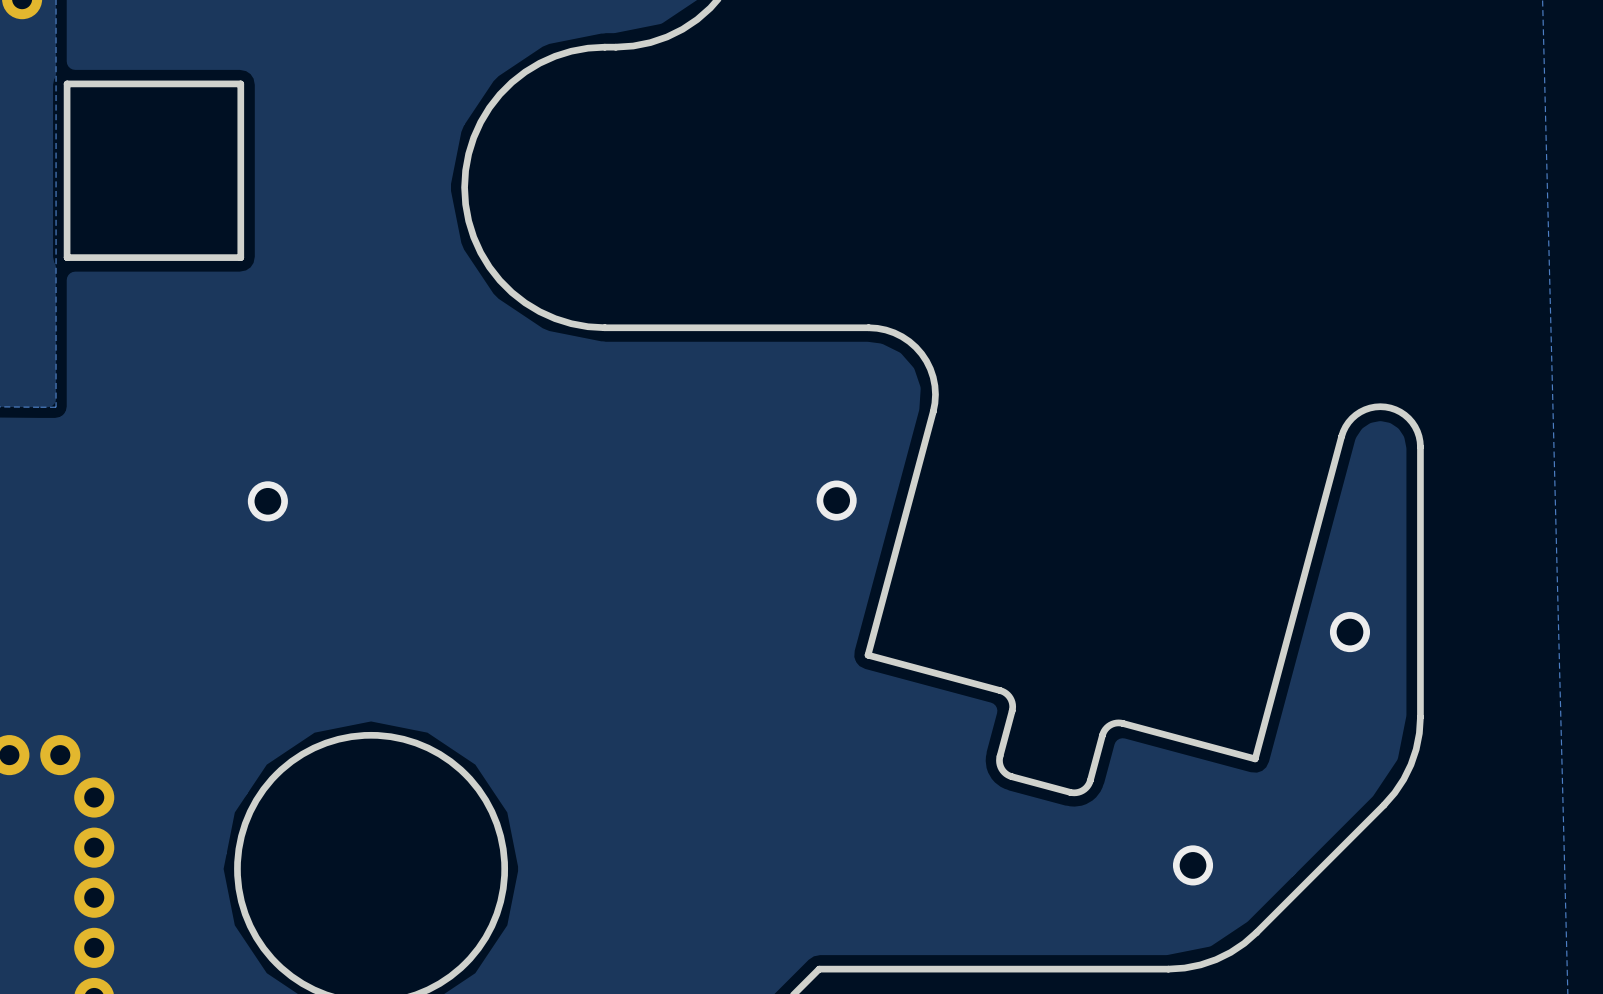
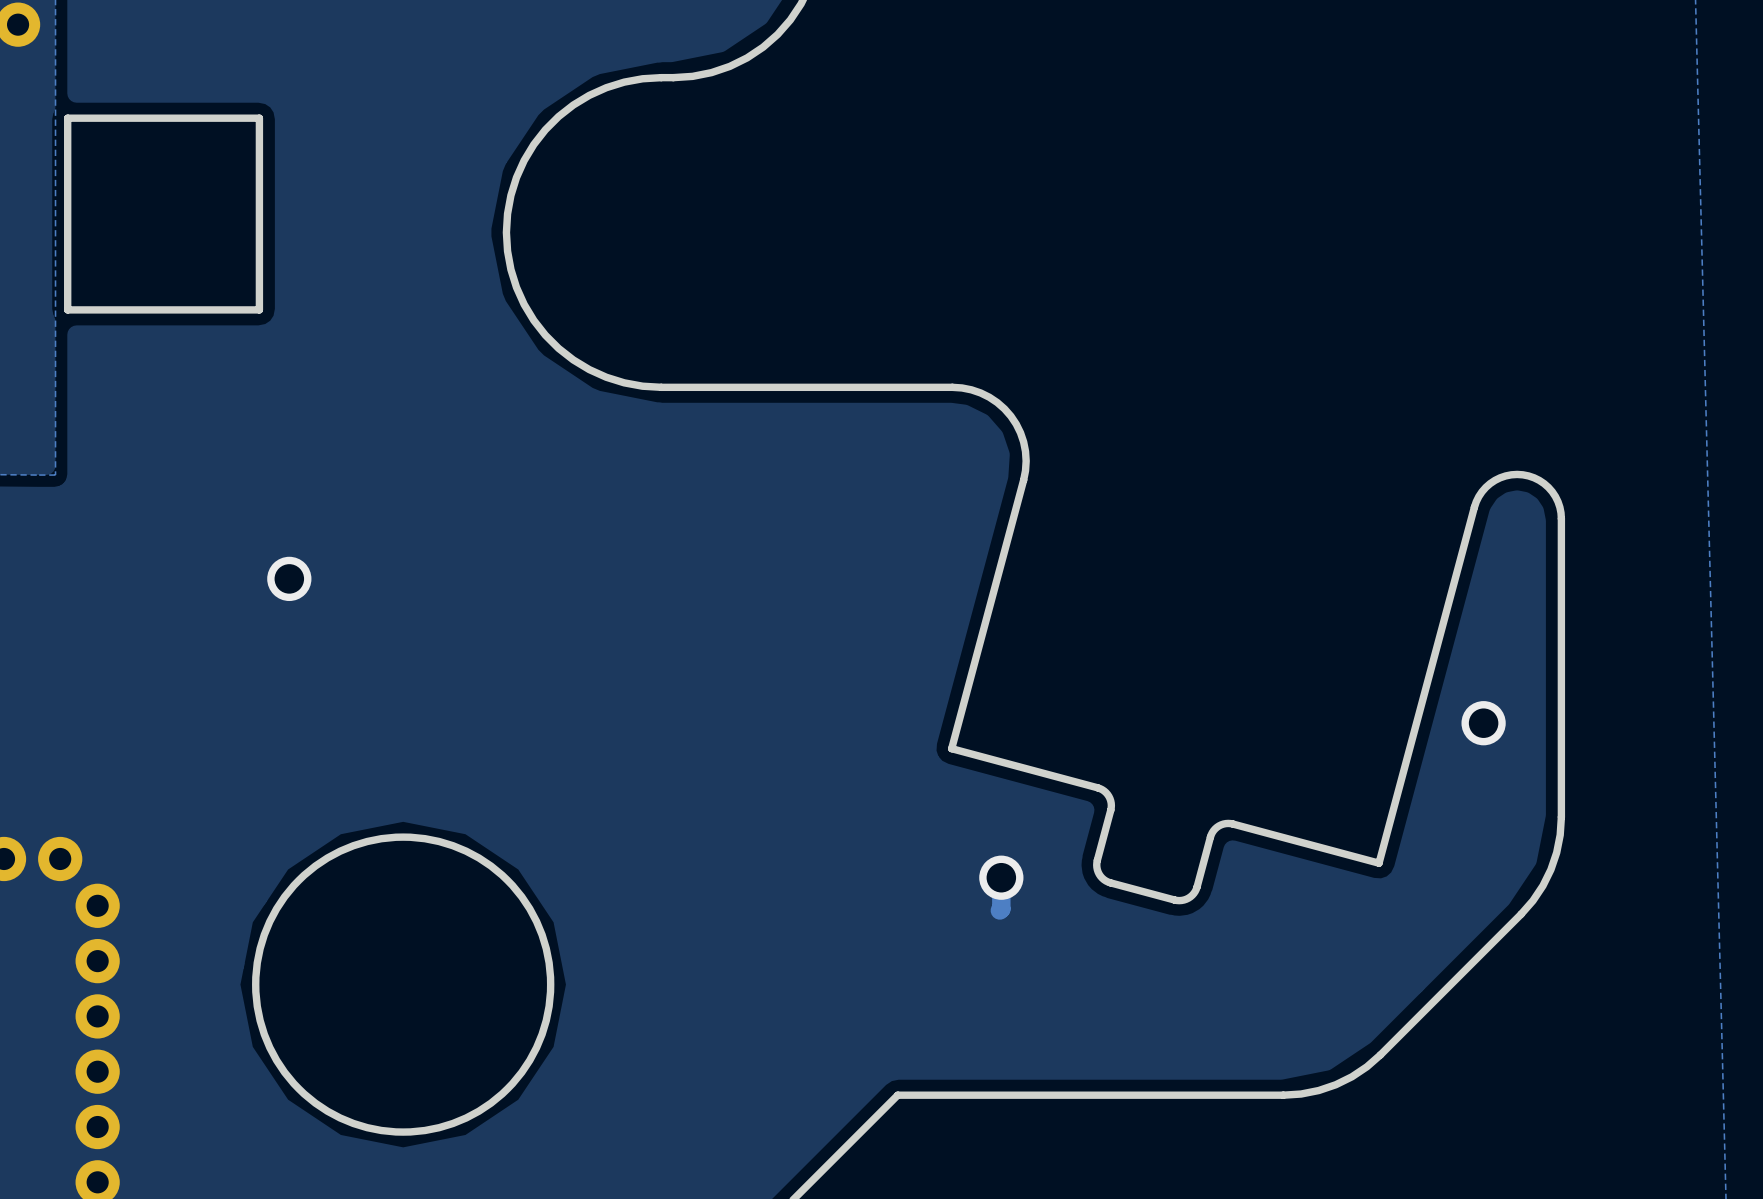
via: (836, 500) -> none
track: none -> (1001, 877) (999, 910)
via: none -> (1001, 877)
via: (1193, 865) -> none

